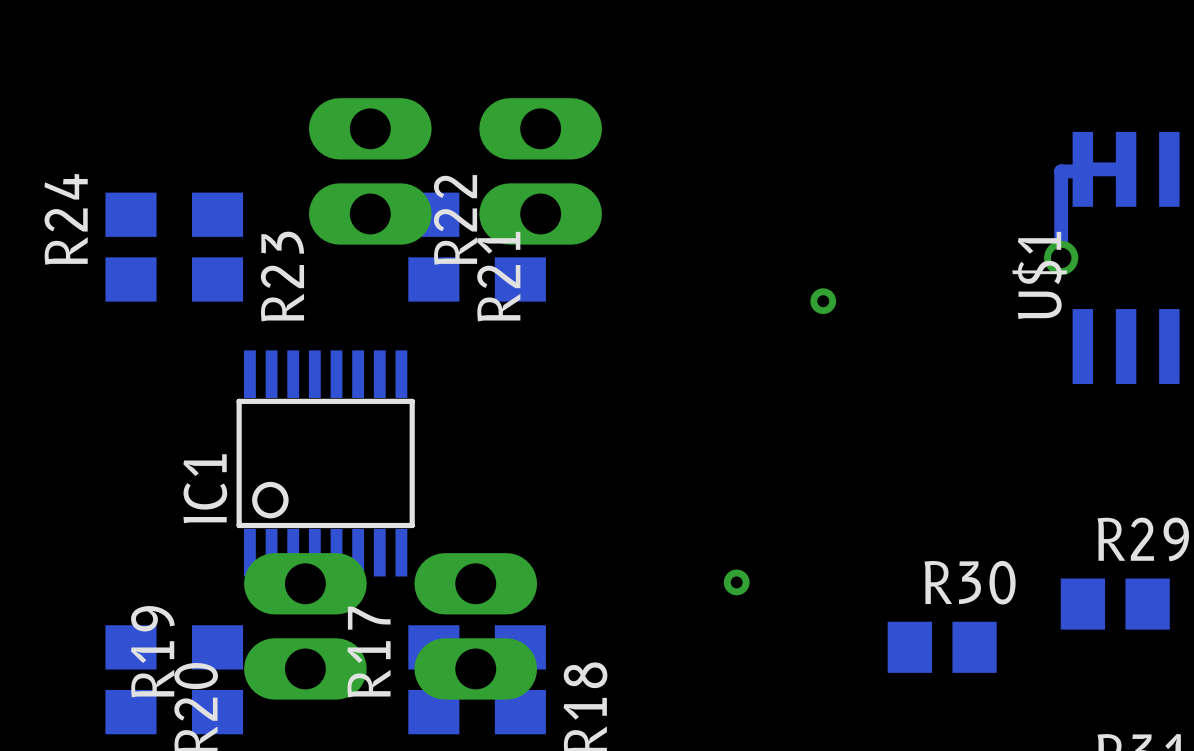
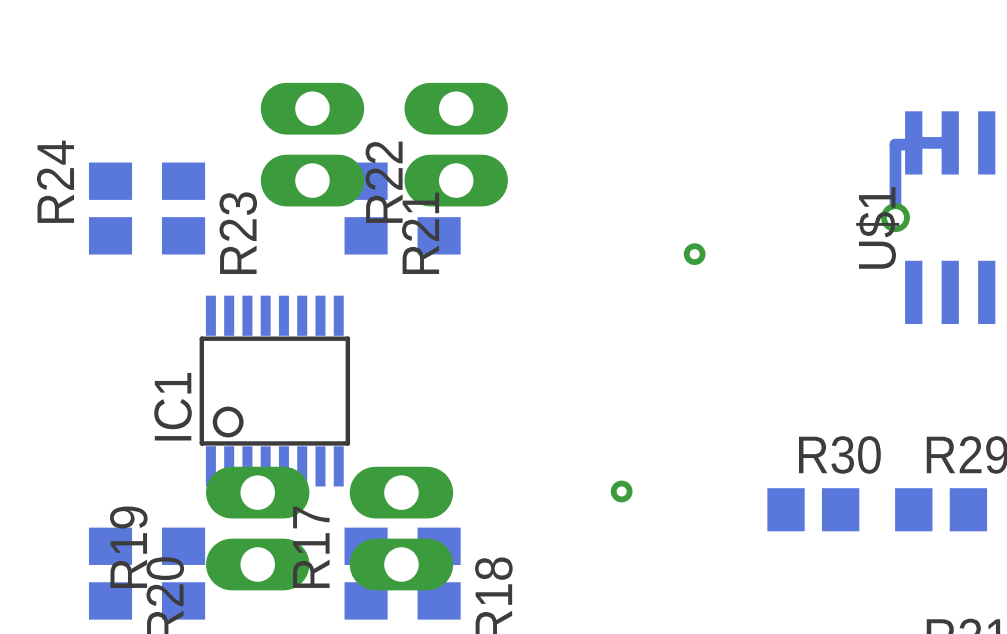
R30 position: (942, 647) -> (813, 509)

